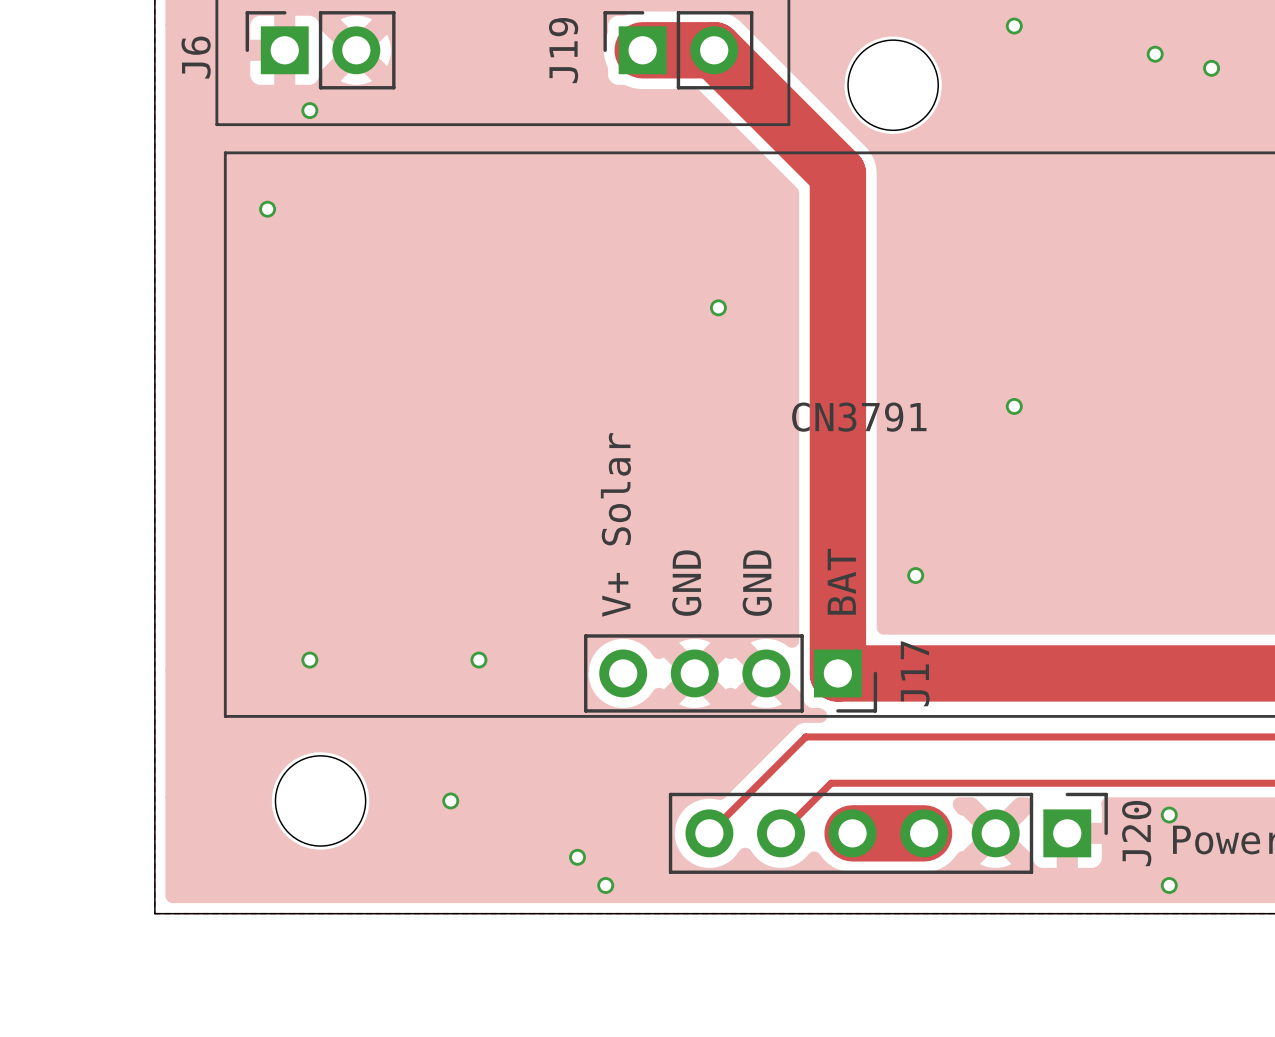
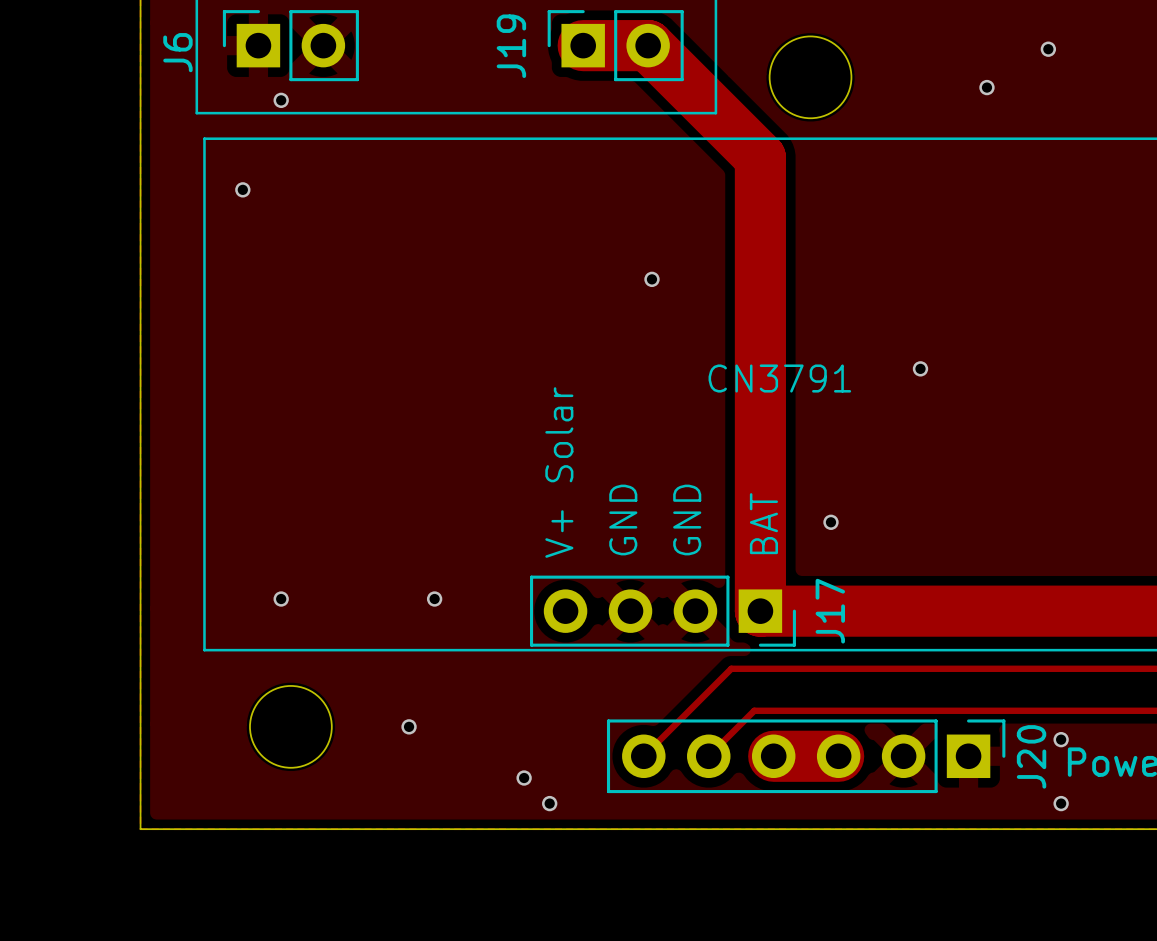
via: (1014, 26) -> none
via: (1211, 68) -> none
via: none -> (986, 87)

